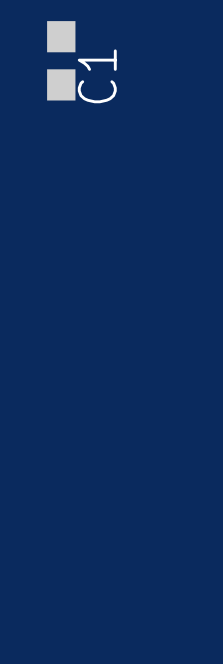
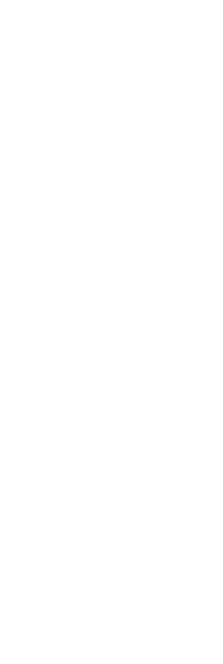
C1: (61, 60) -> none

